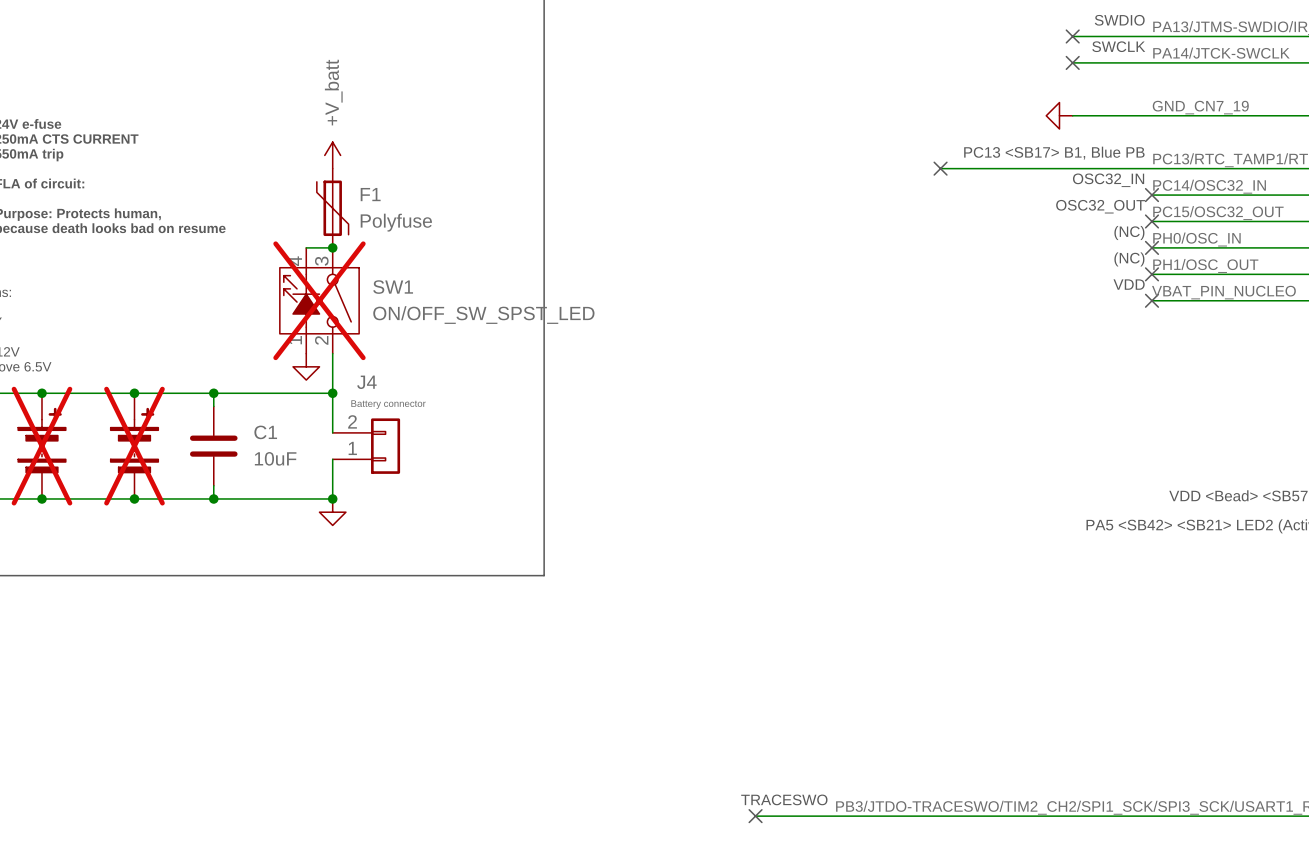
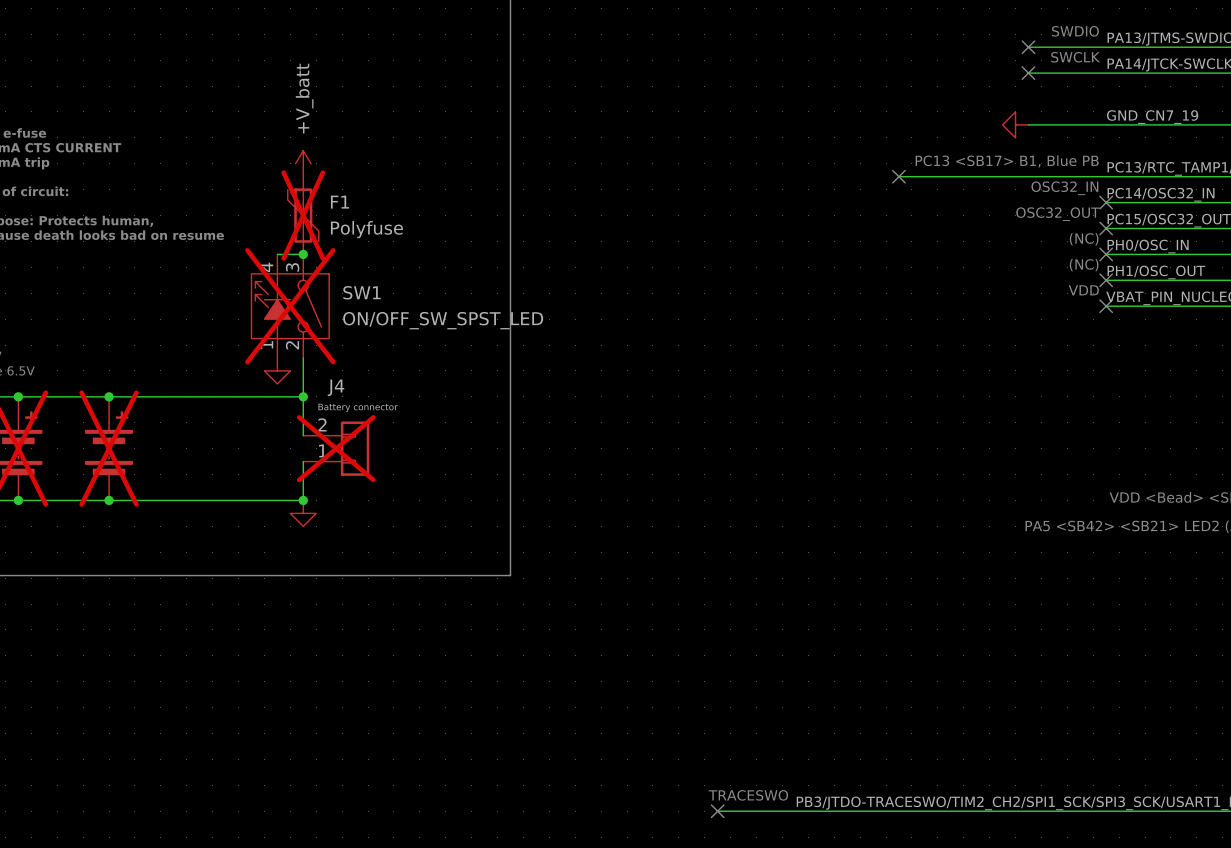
F1 do-not-place cross: none -> (303, 215)
wire: (213, 393) (213, 406) -> none
junction: (213, 393) -> none
C1: 10uF (213, 446) -> none
J4 do-not-place cross: none -> (336, 448)
wire: (213, 485) (213, 498) -> none
junction: (213, 498) -> none

